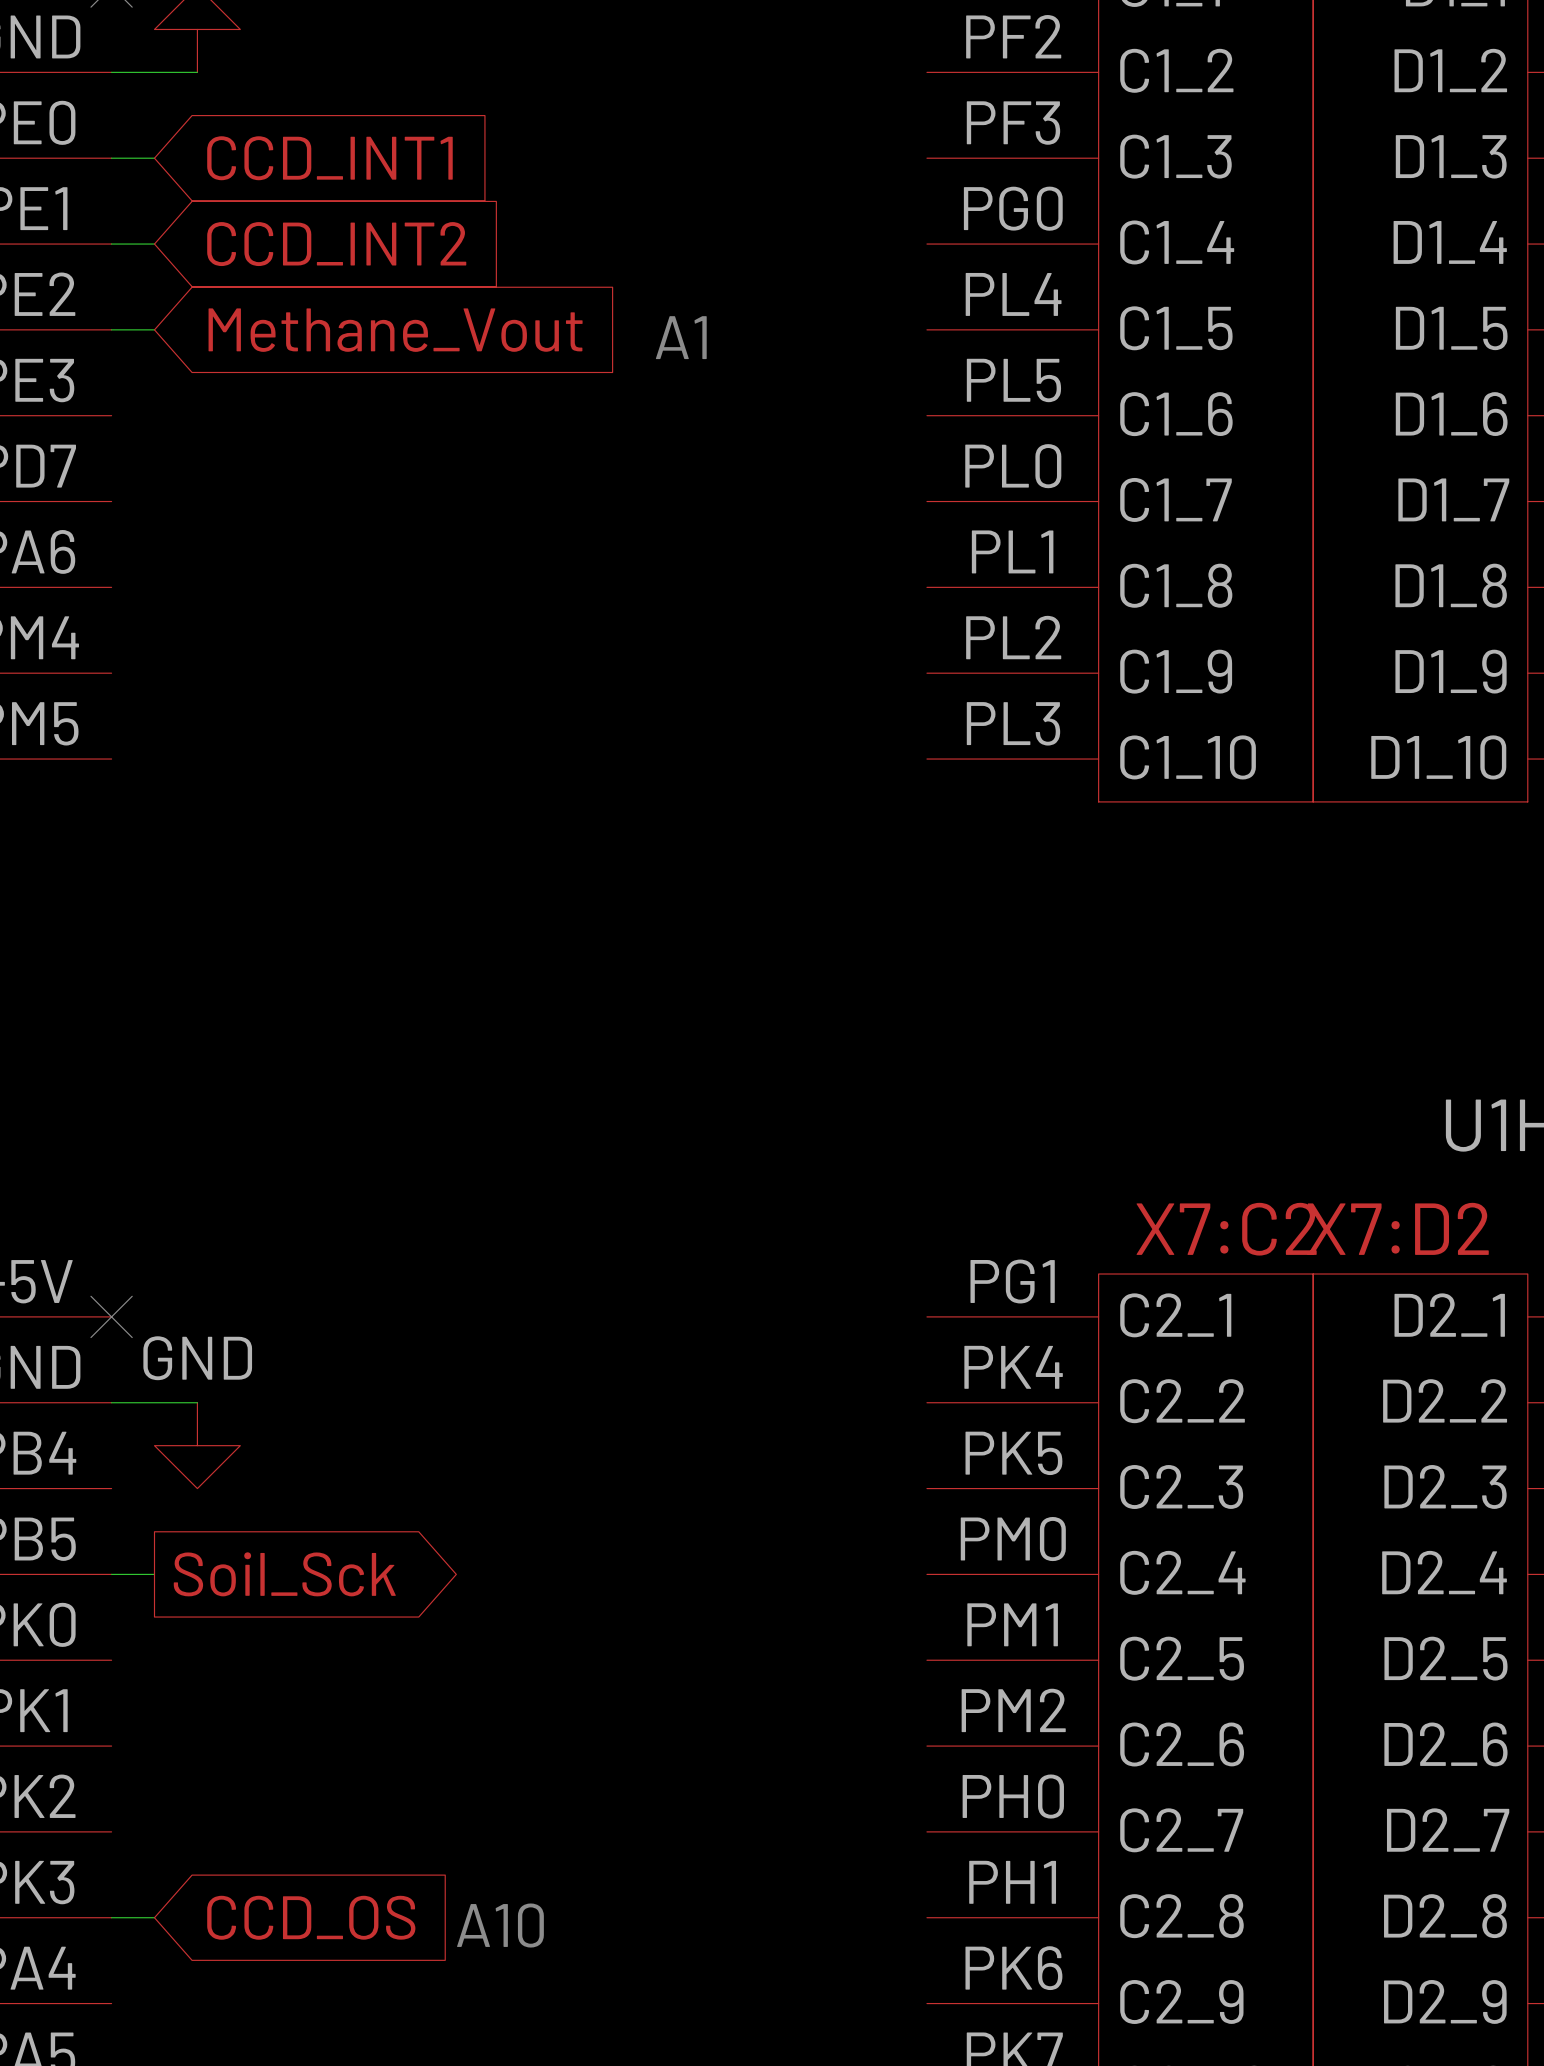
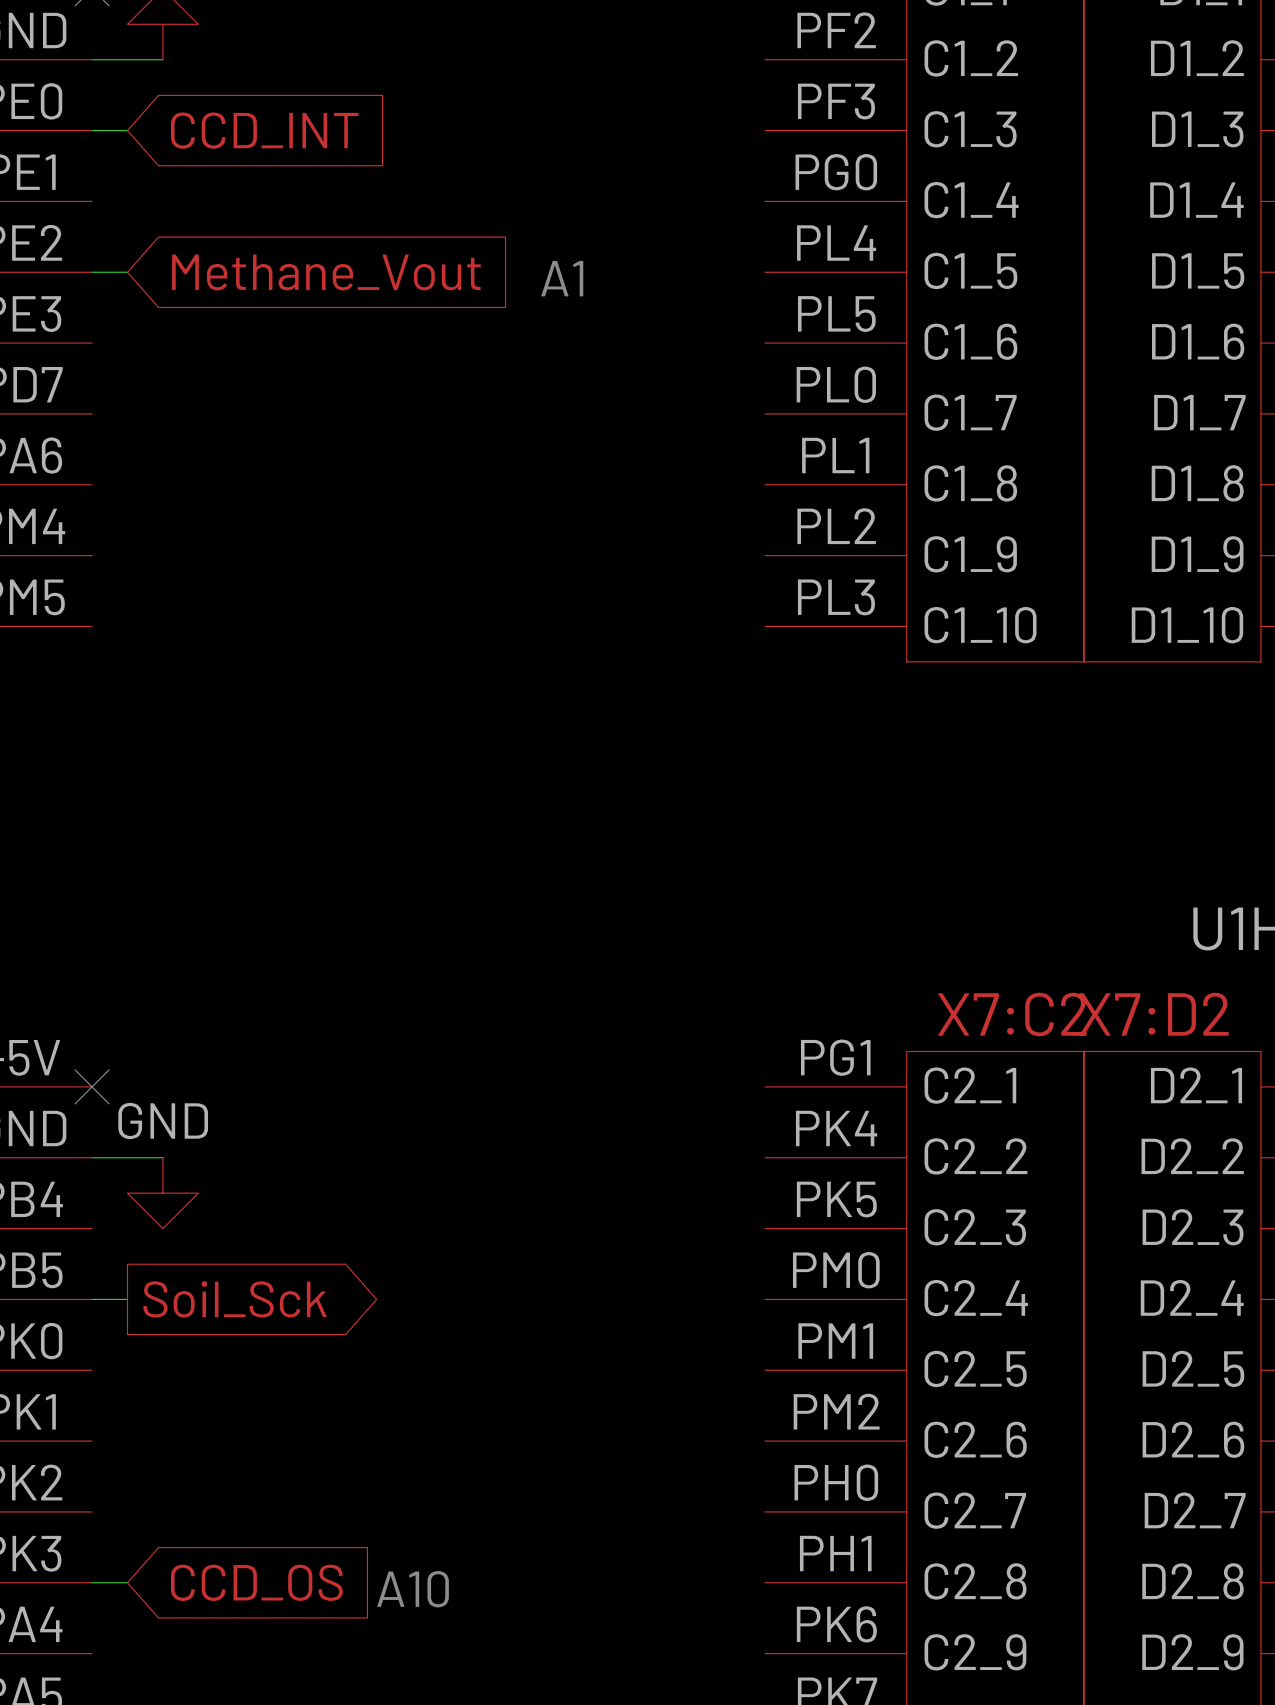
global label: CCD_INT1 (329, 158) -> CCD_INT (264, 130)
wire: (111, 244) (154, 244) -> none
global label: CCD_INT2 (336, 244) -> none

